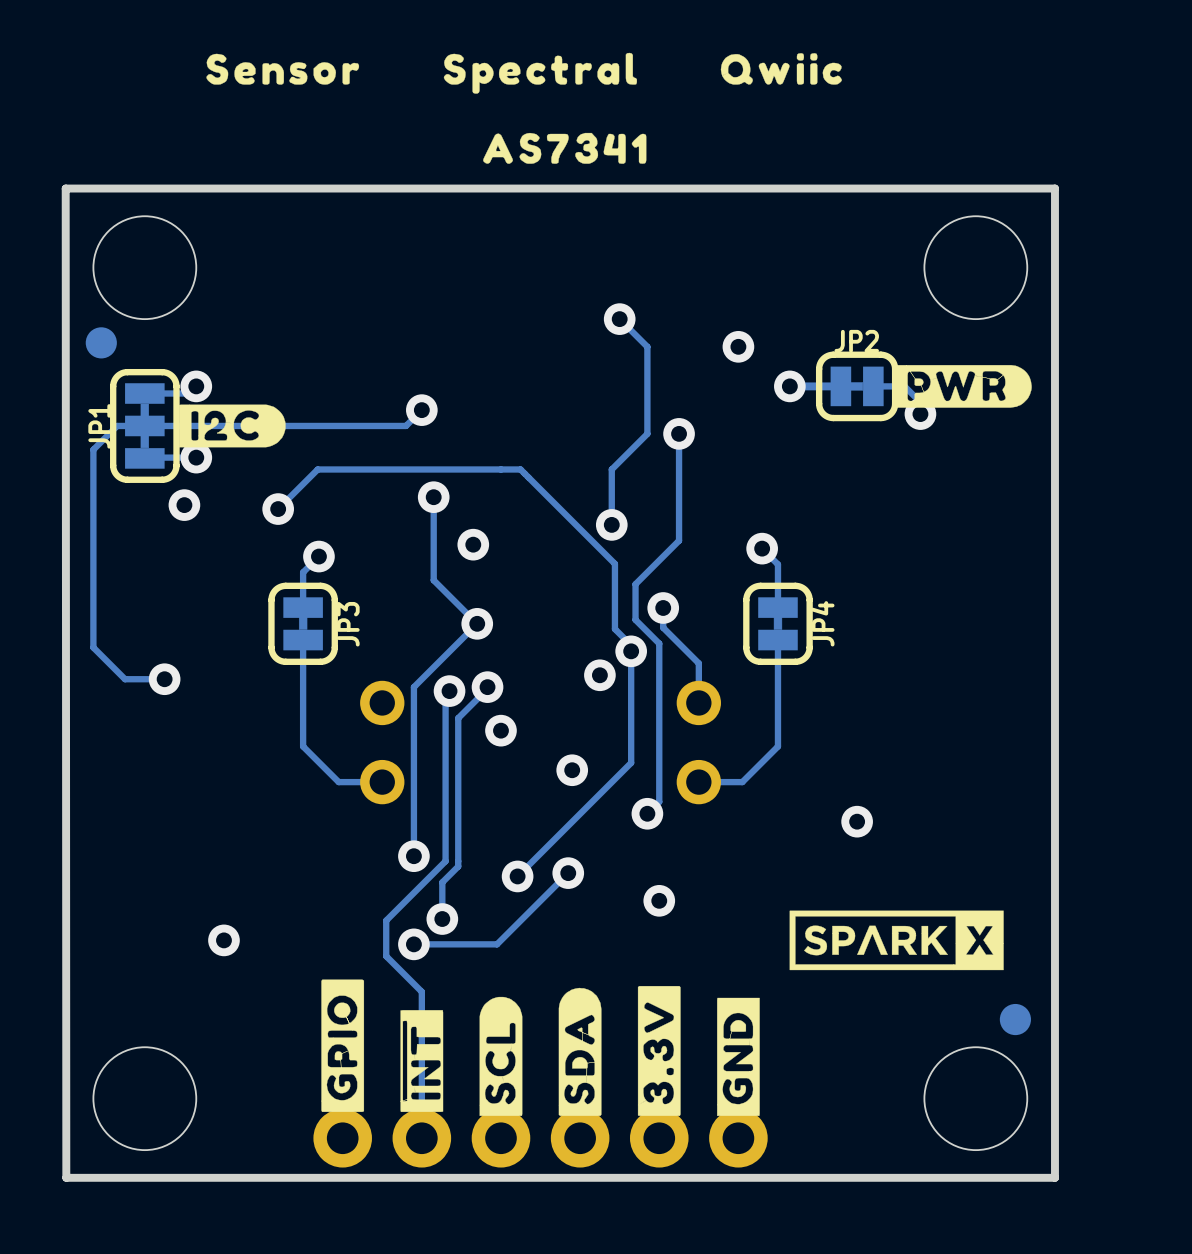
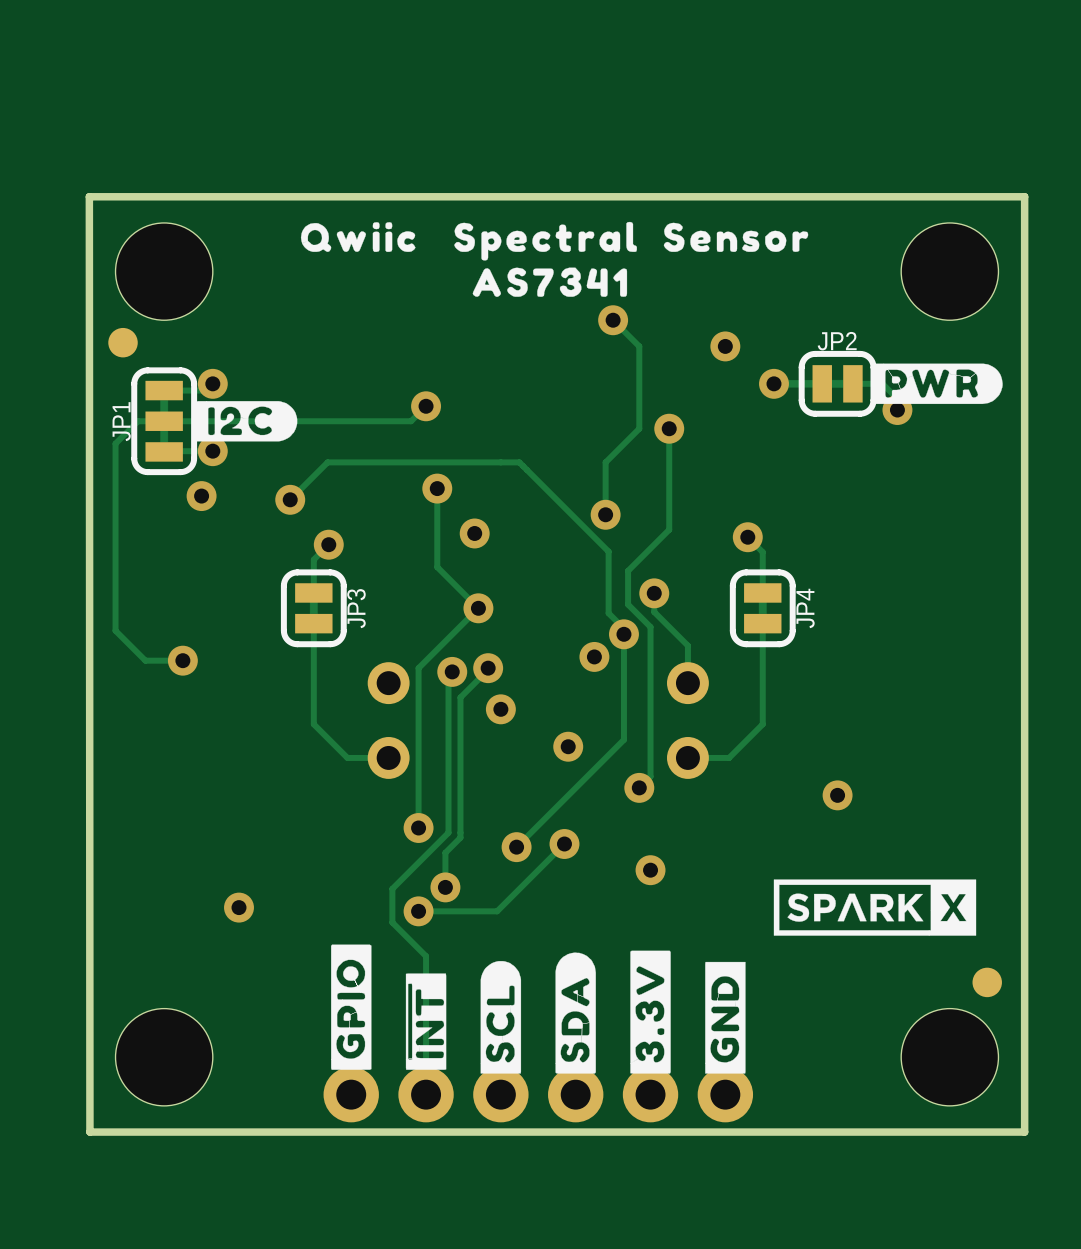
drawing position: (781, 68) -> (358, 237)
drawing position: (282, 69) -> (735, 237)
drawing position: (540, 73) -> (545, 241)
drawing position: (564, 148) -> (549, 282)

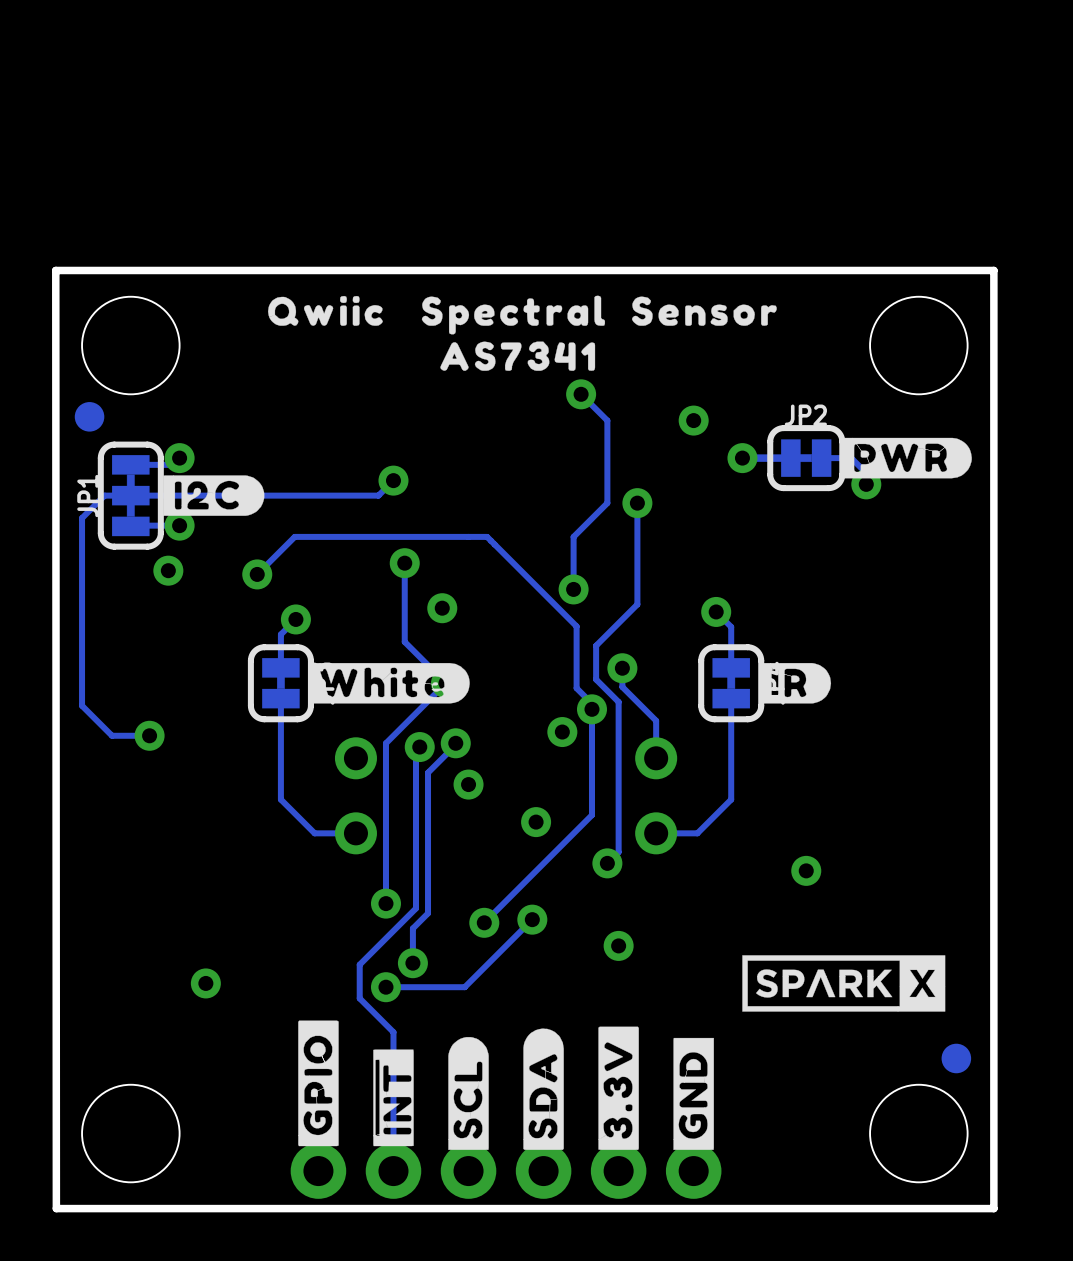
drawing: none -> [309, 663, 470, 704]
drawing: none -> [759, 663, 832, 704]

